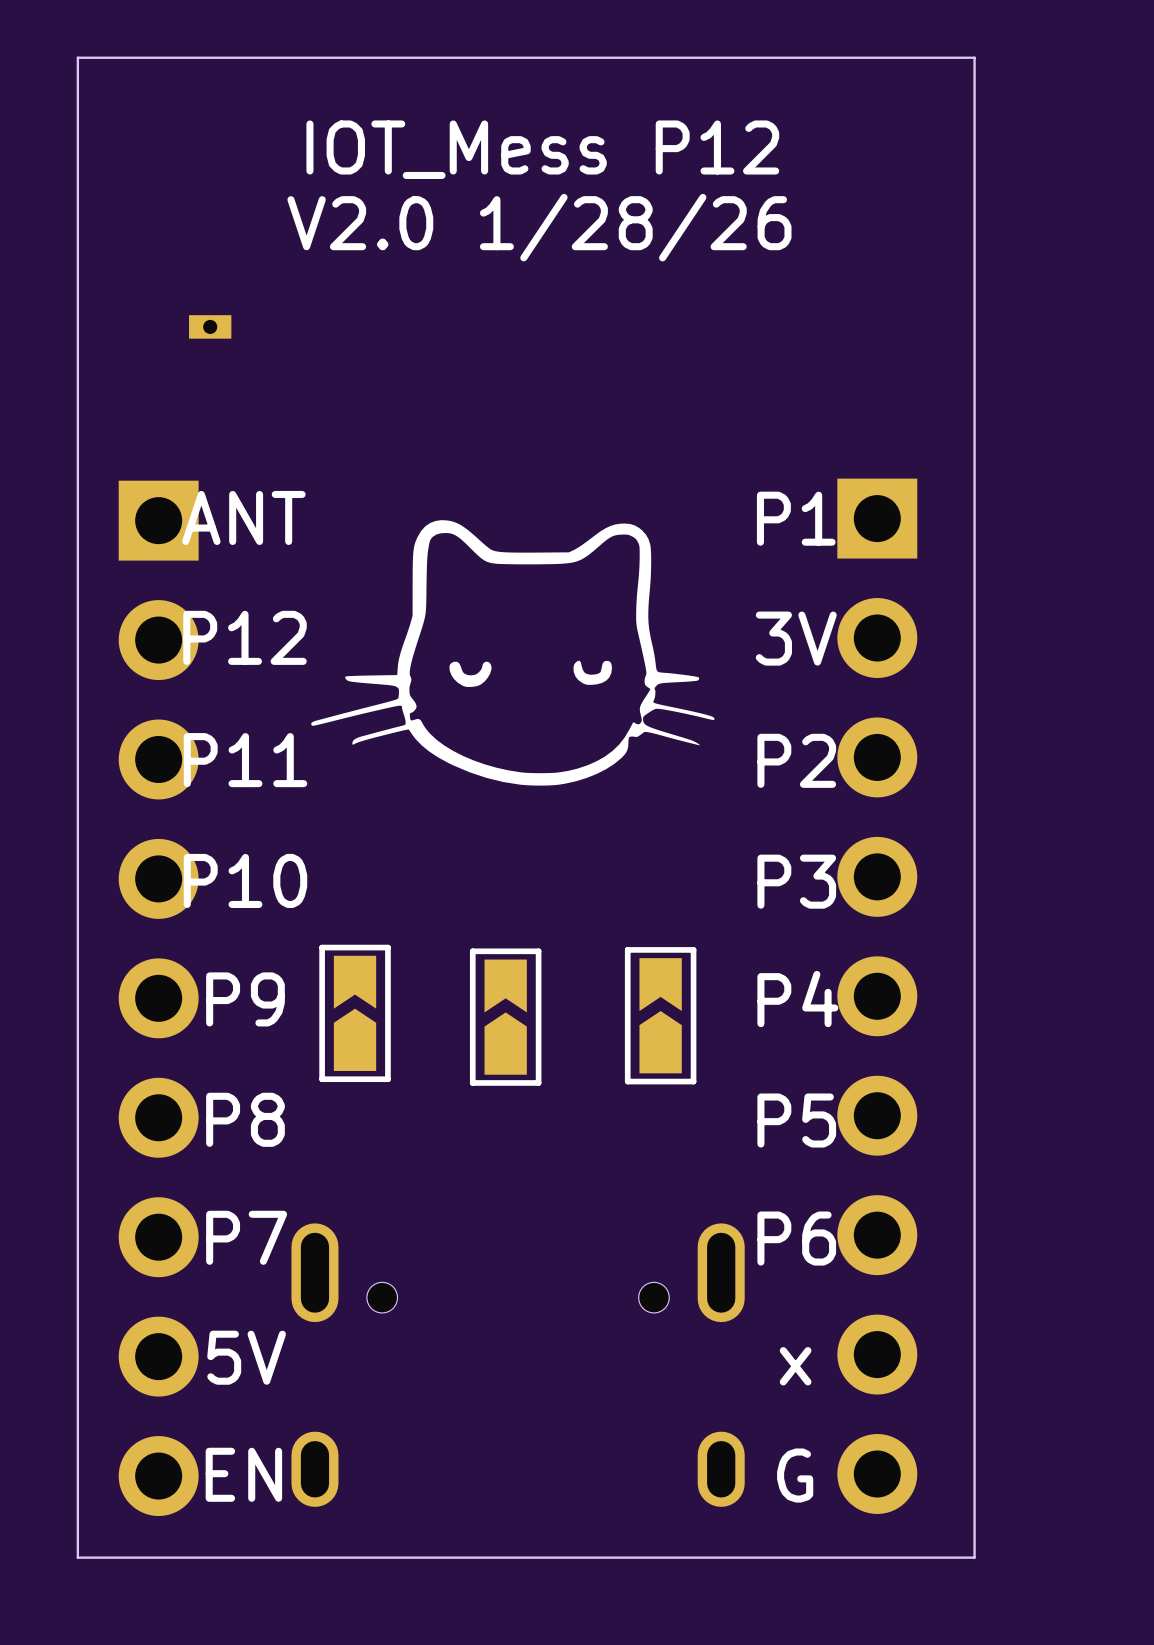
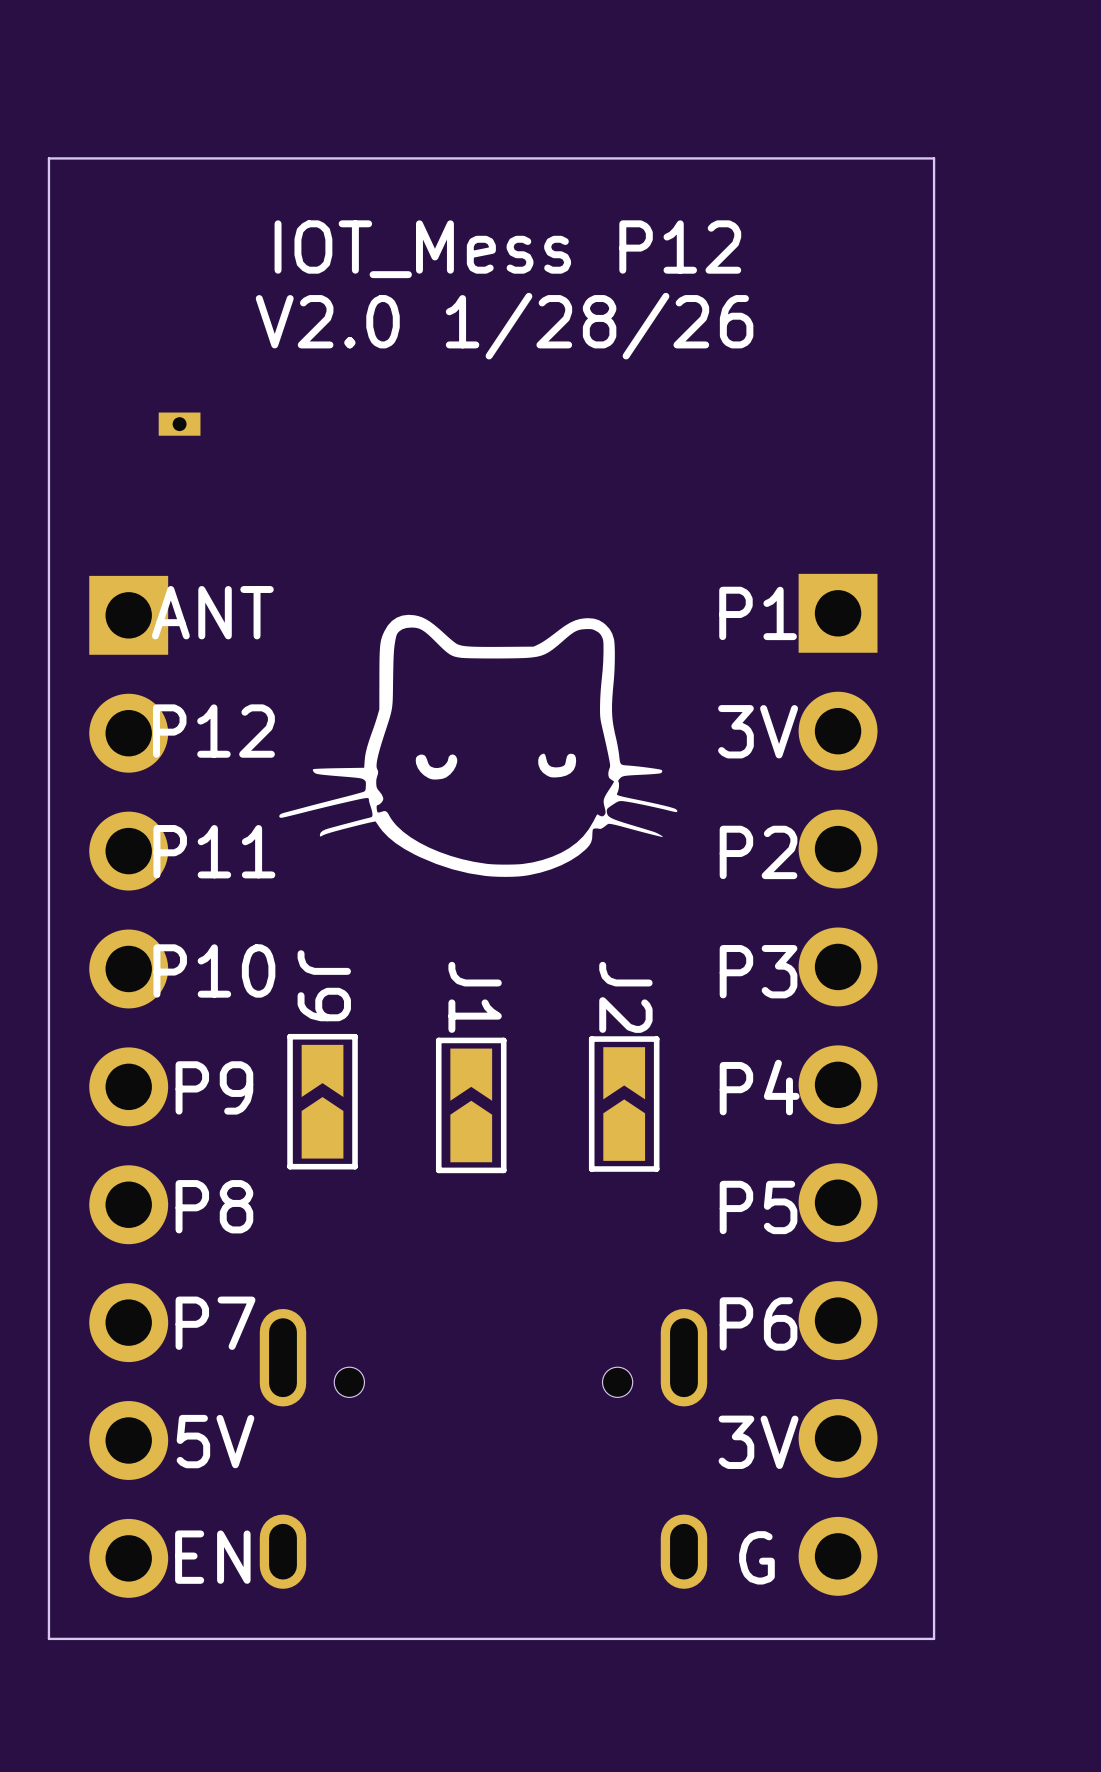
J9 name: none -> J9 (324, 985)
J1 name: none -> J1 (475, 997)
J2 name: none -> J2 (625, 997)
text: x (795, 1366) -> 3V (758, 1442)

